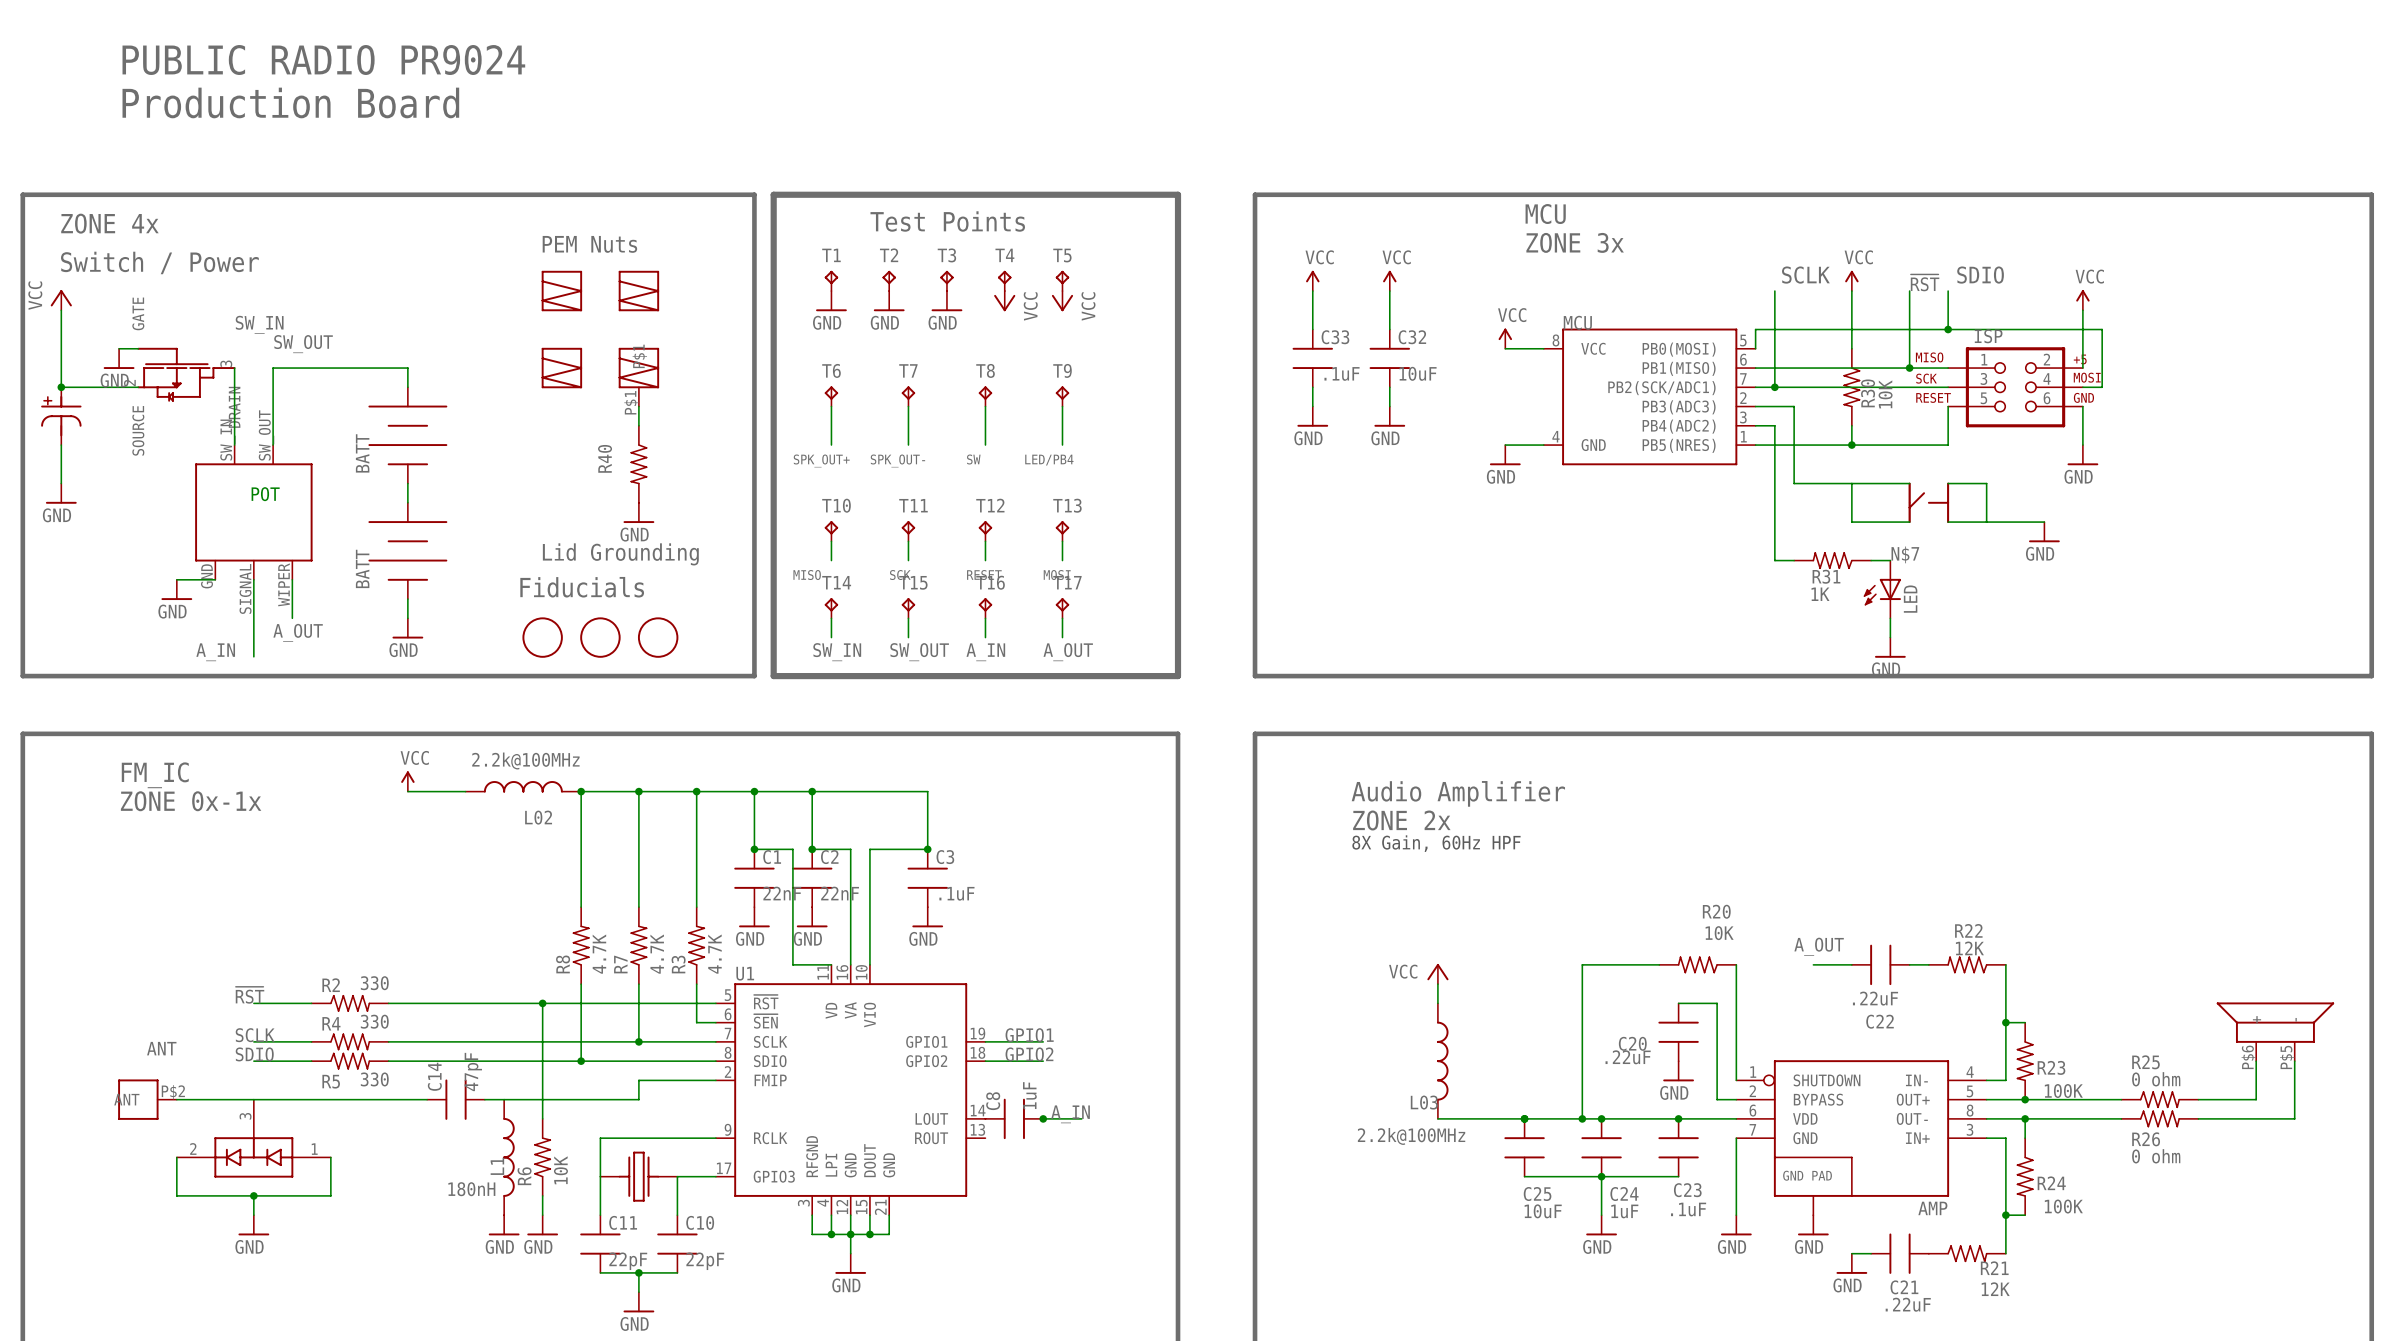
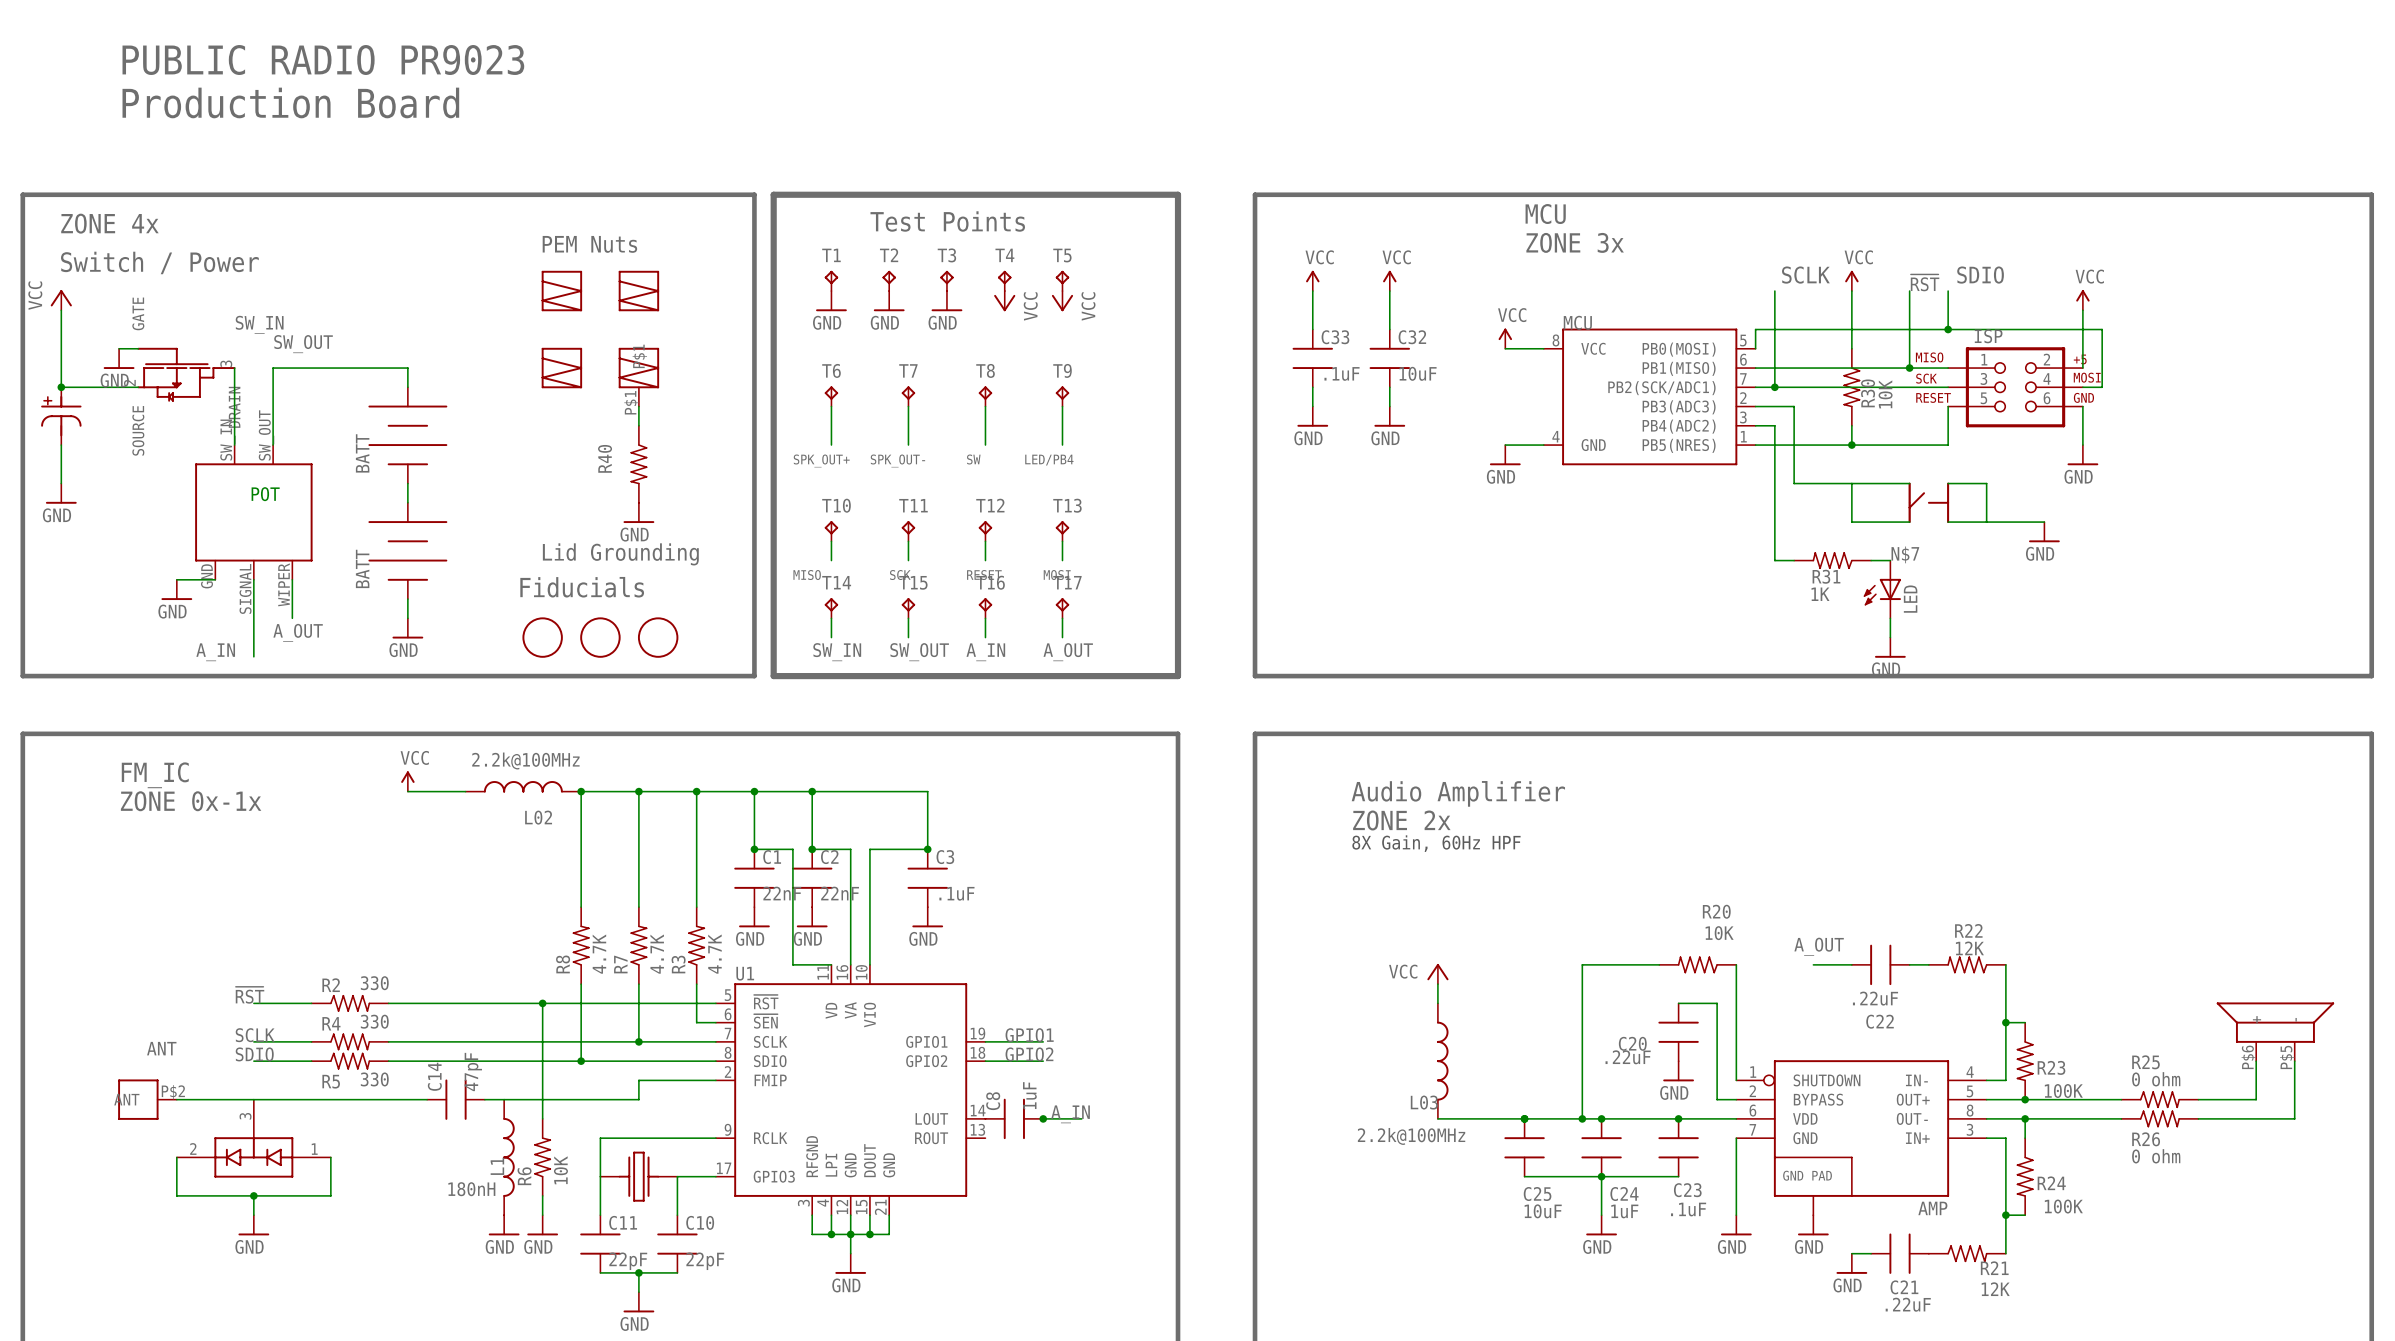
text: PUBLIC RADIO PR9024 (323, 60) -> PUBLIC RADIO PR9023 (323, 60)

